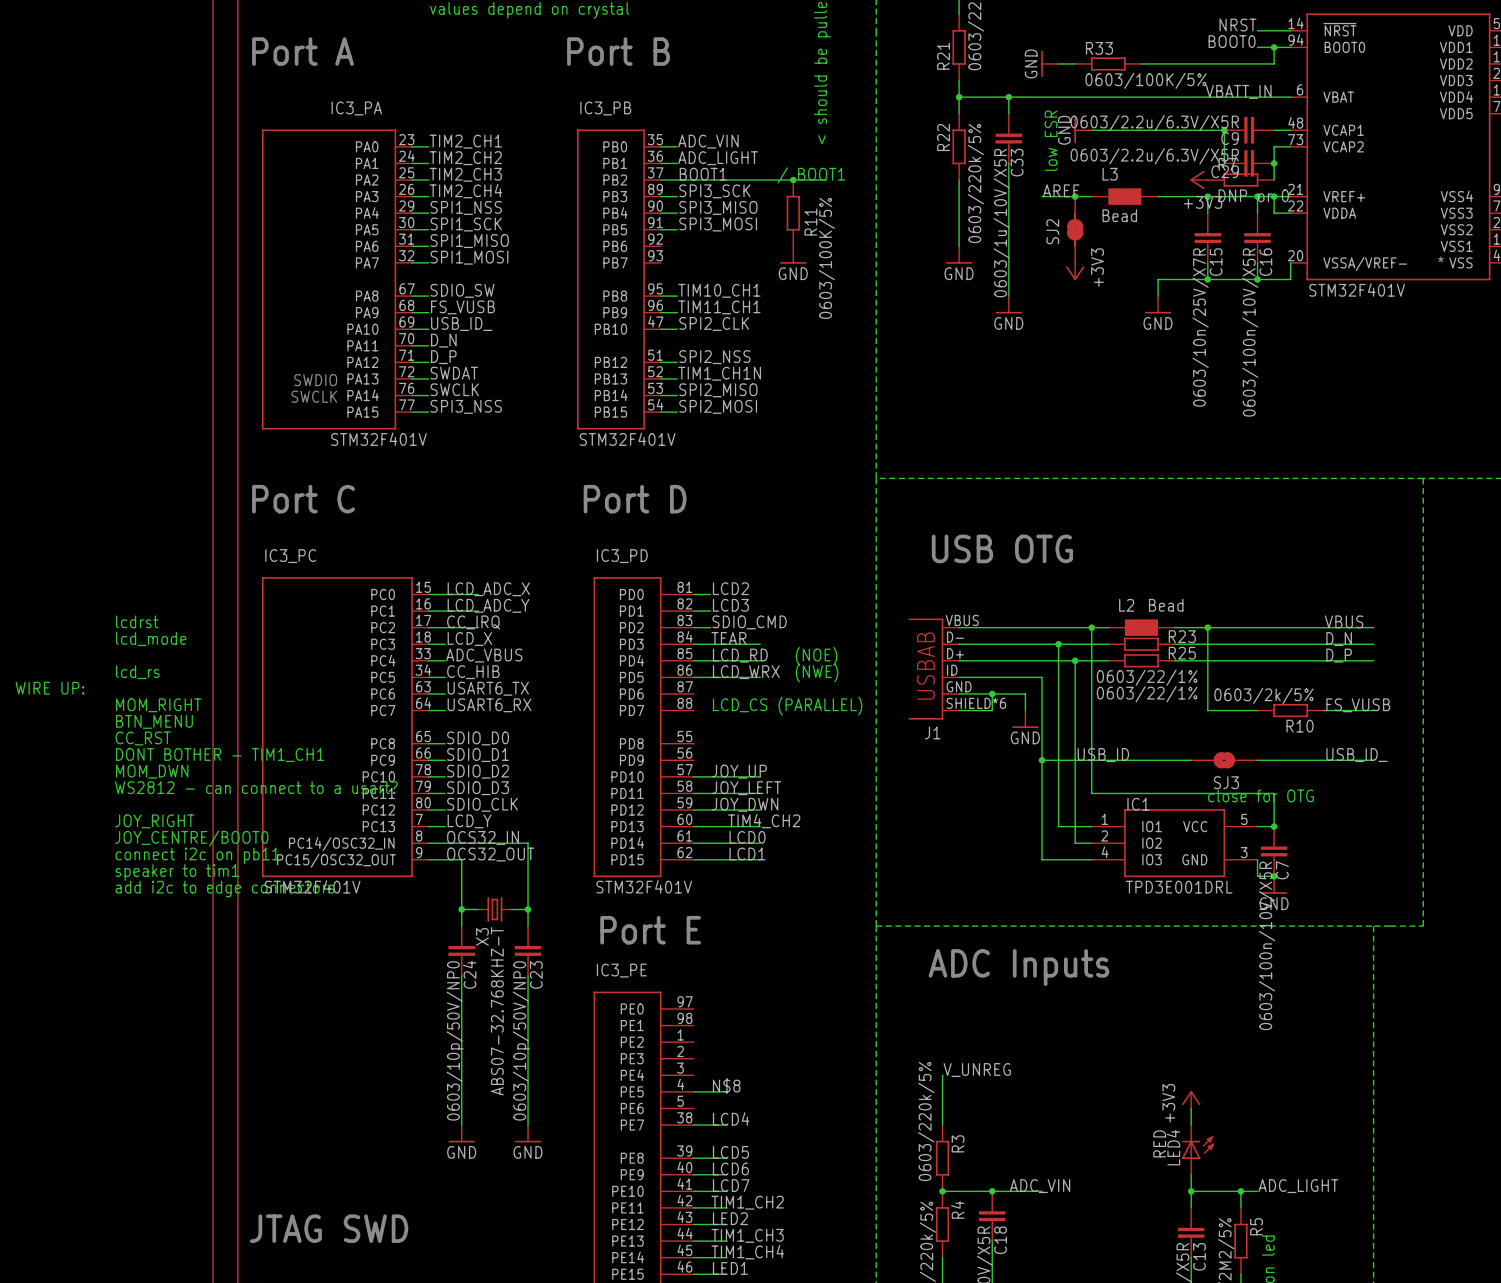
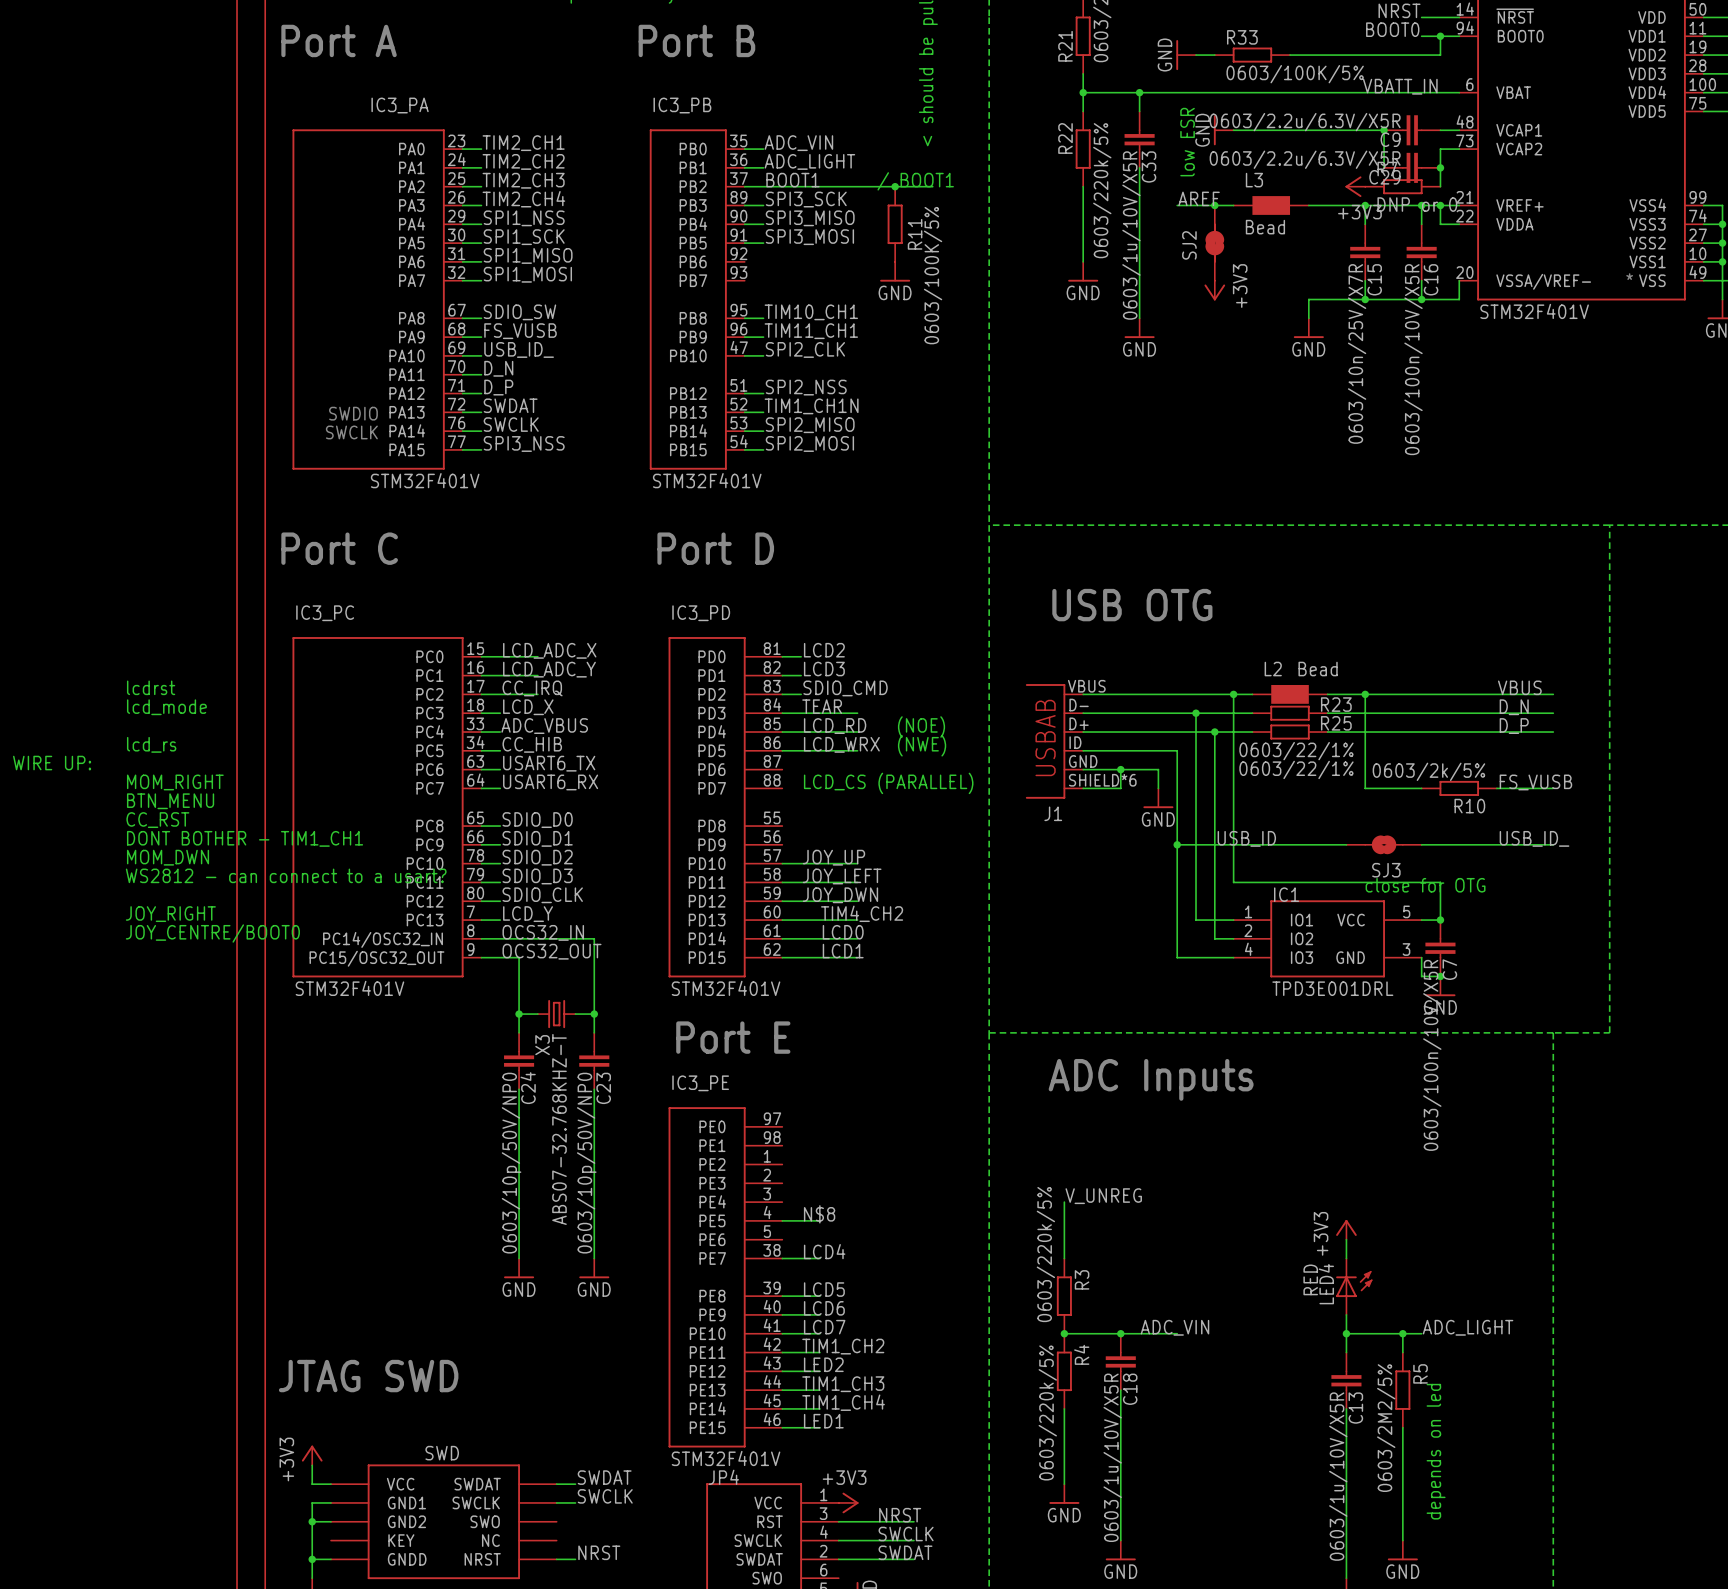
text: connect i2c on pb11 (197, 855) -> none
text: speaker to tim1 (177, 872) -> none
text: add i2c to edge connectors (225, 889) -> none

